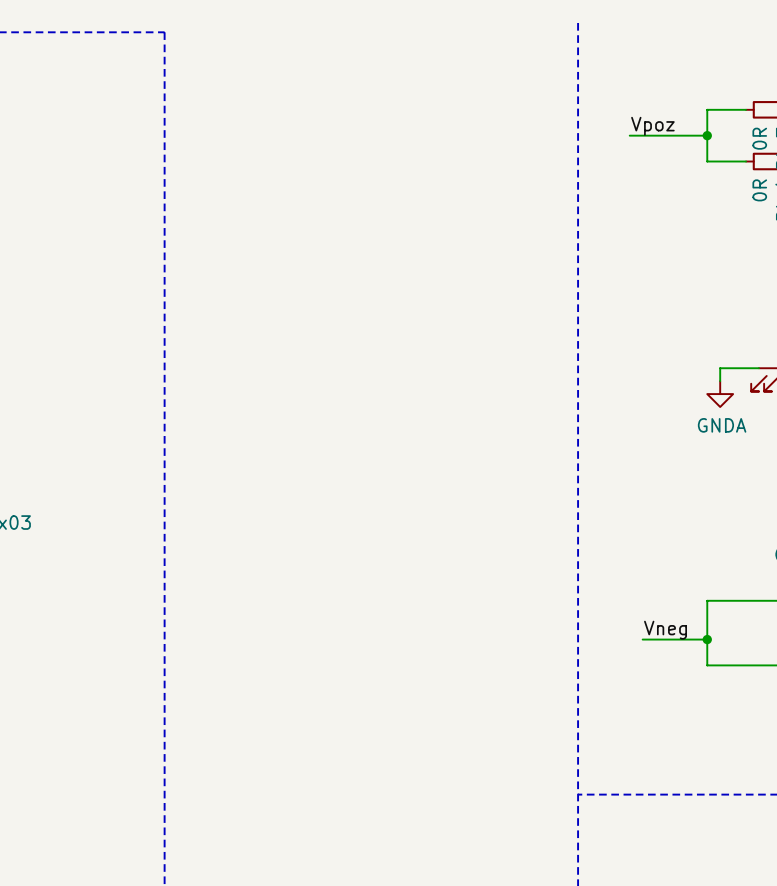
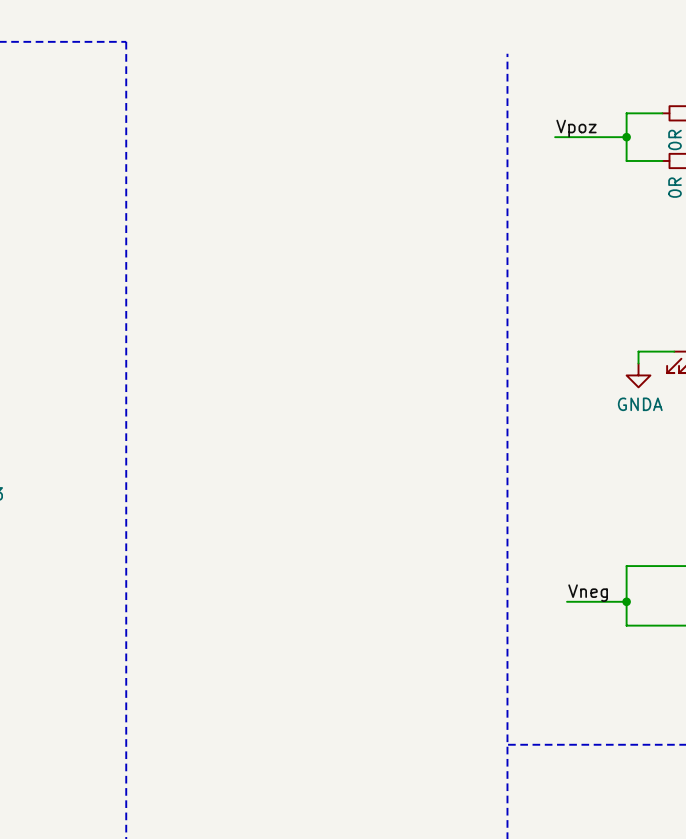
line: (578, 19) (578, 45) -> none

